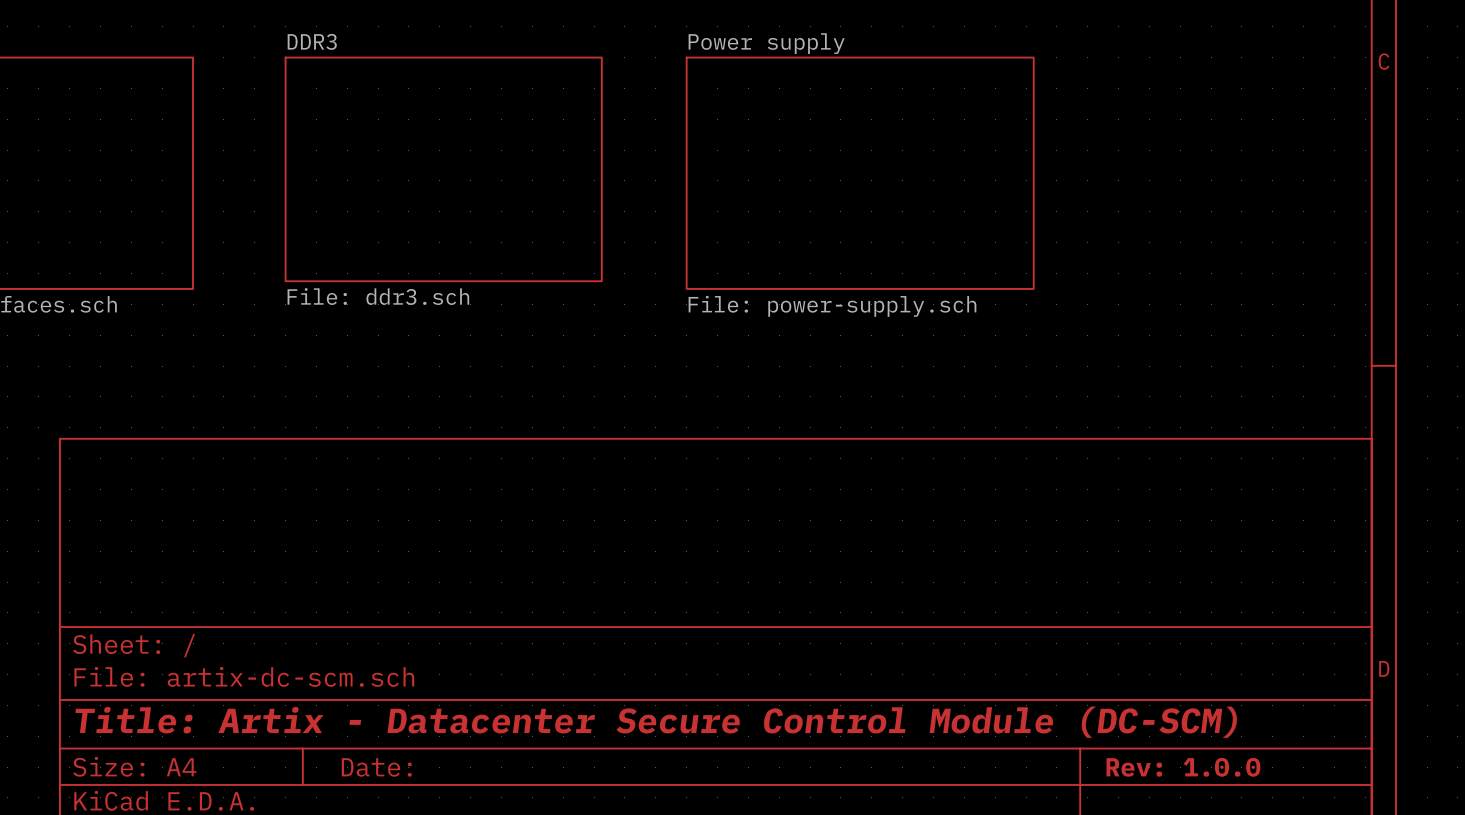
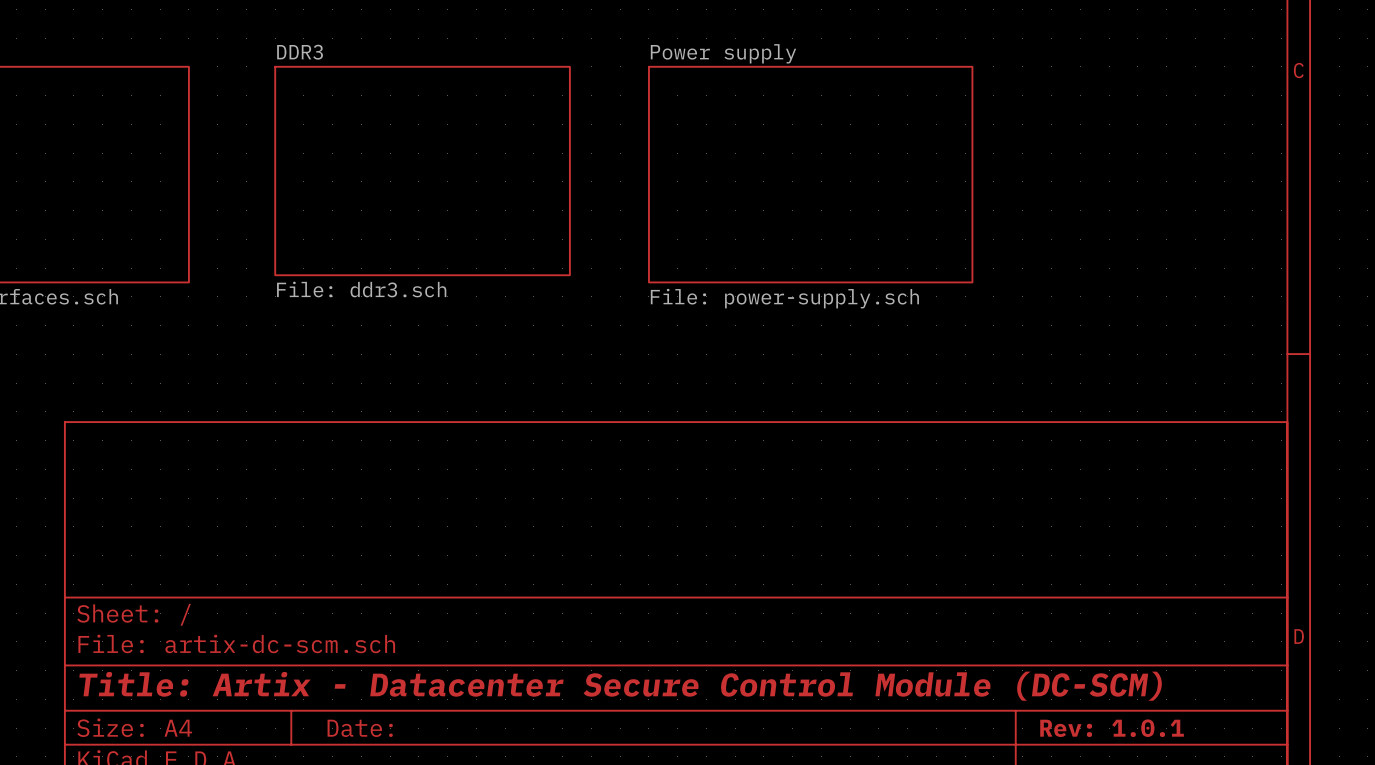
title block: Rev: 1.0.0 (1183, 767) -> Rev: 1.0.1 (1112, 728)

